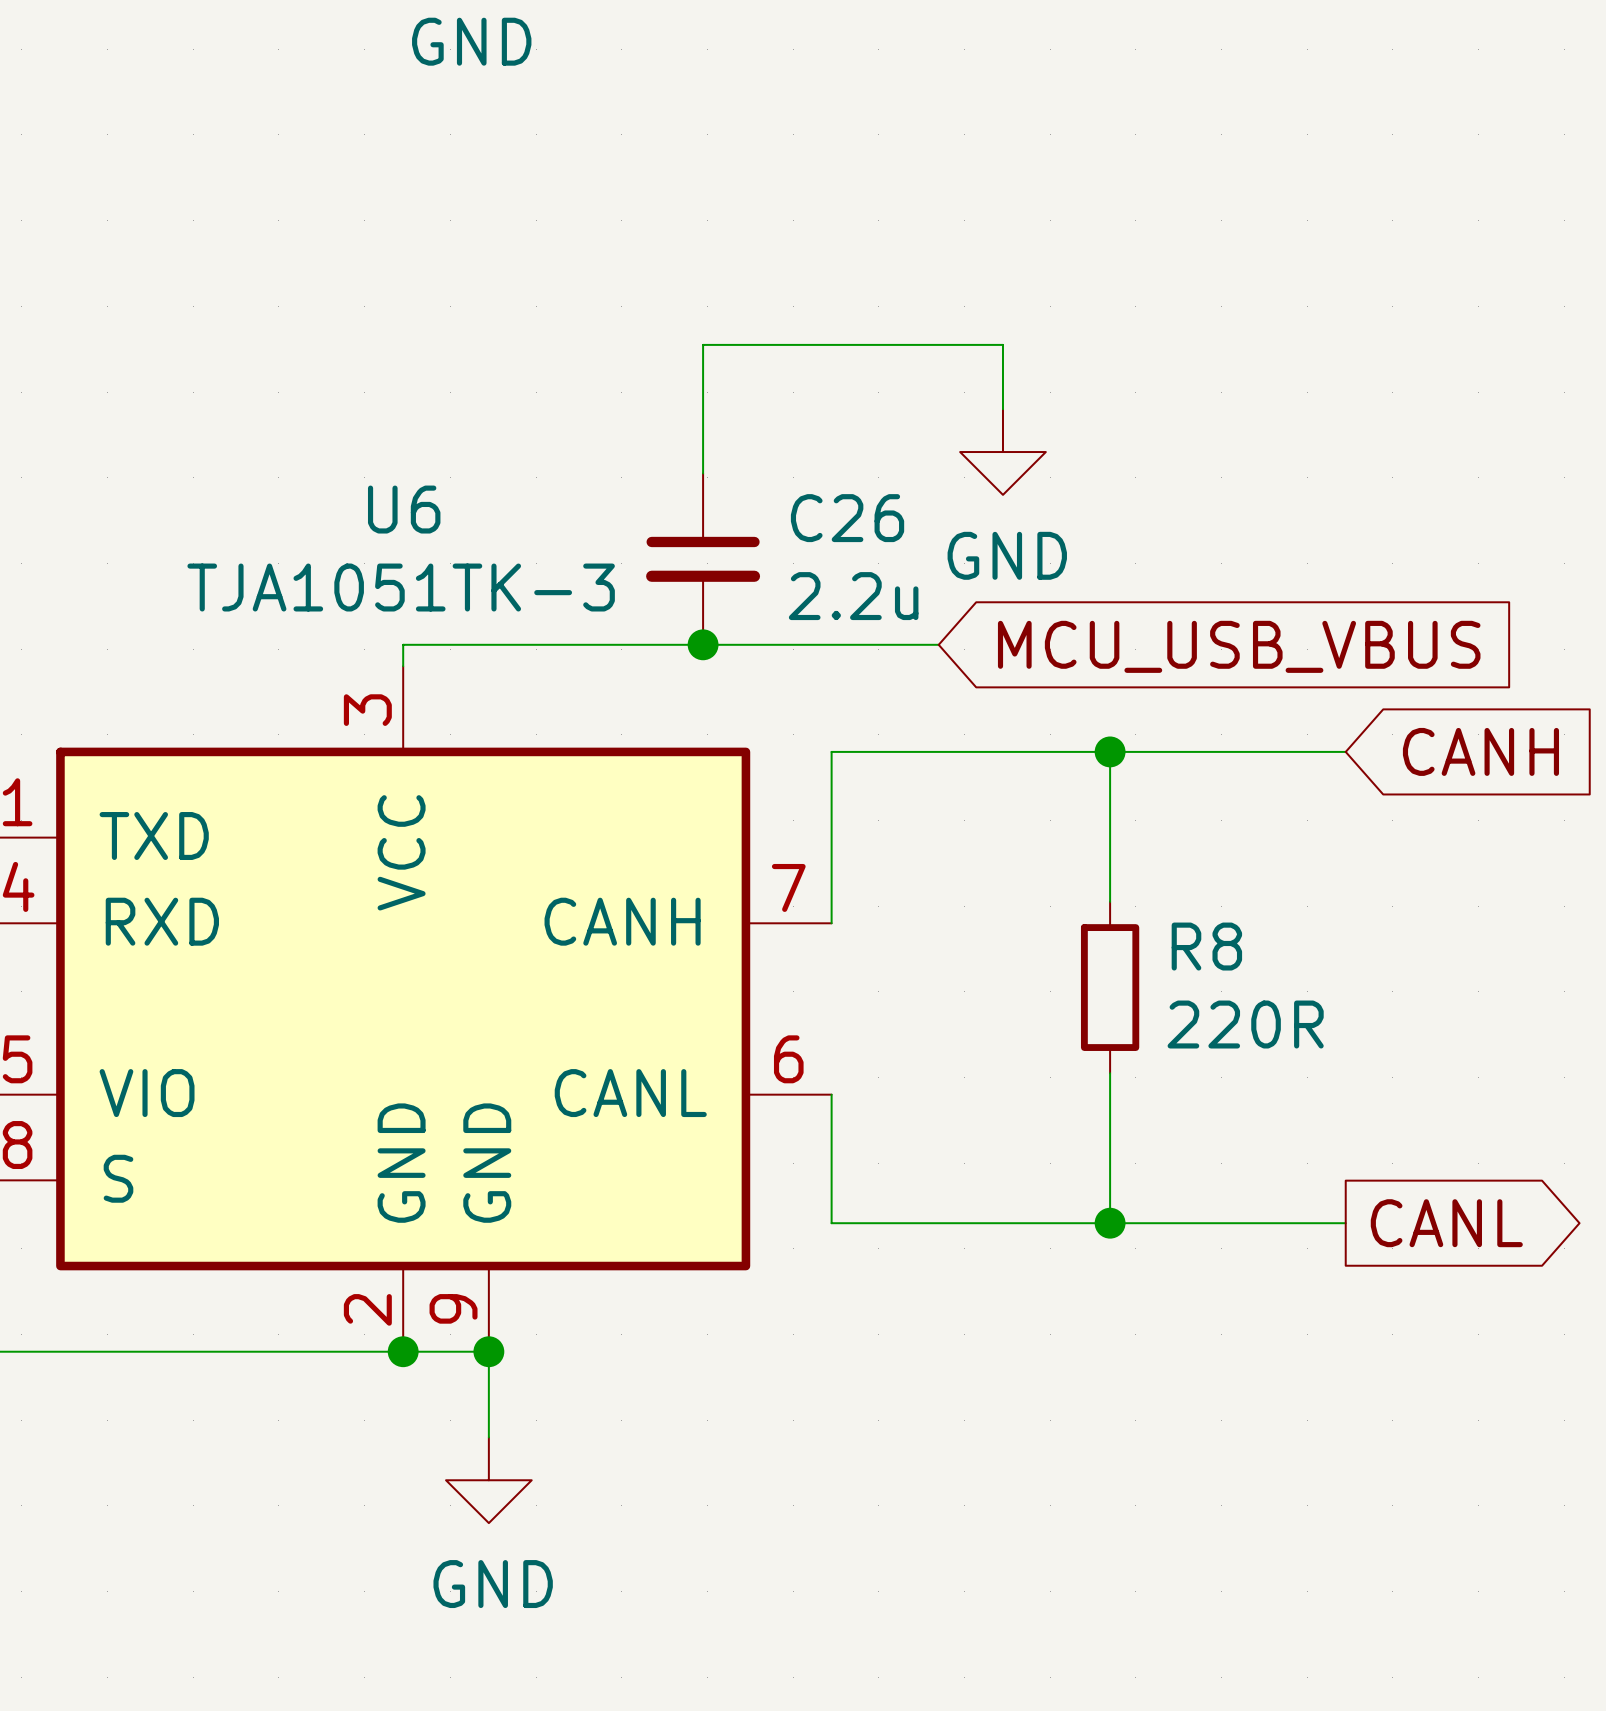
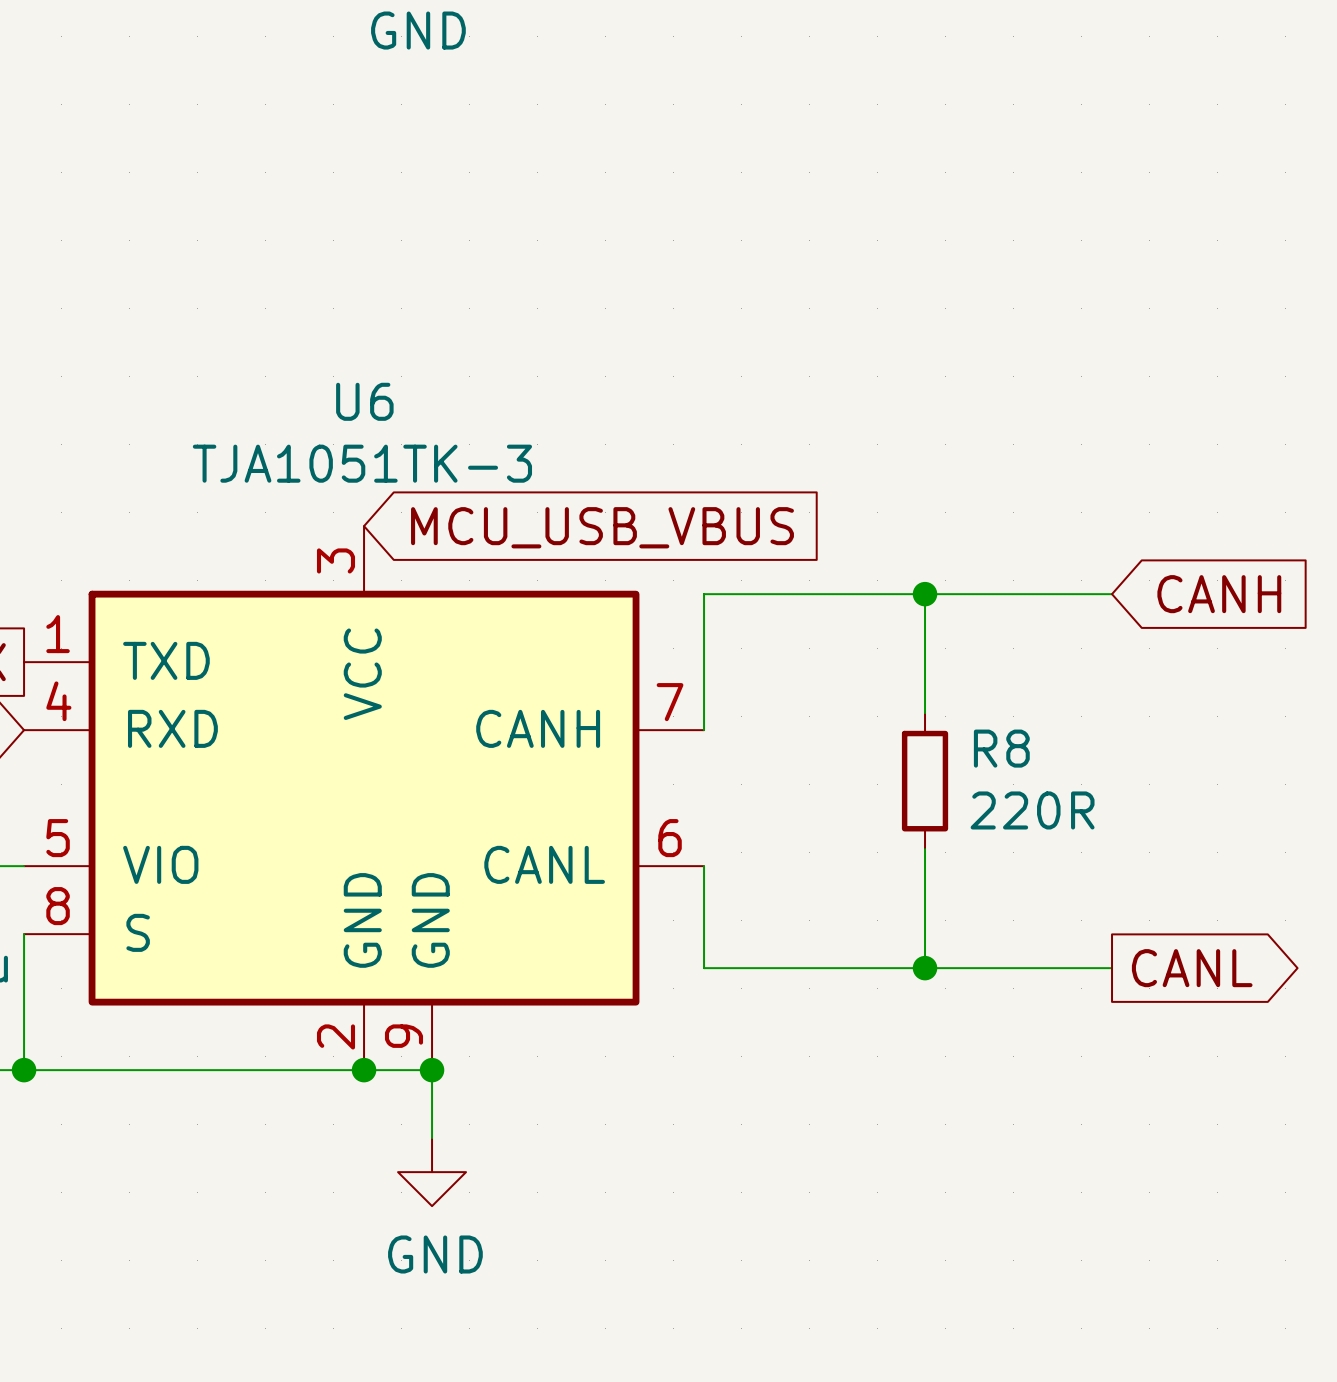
wire: (1002, 409) (1002, 344) (703, 344) (703, 473) -> none
power symbol: GND (1002, 452) -> none
C26: 2.2u (703, 559) -> none
junction: (703, 644) -> none
wire: (938, 644) (403, 644) (403, 666) -> none
global label position: MCU_USB_VBUS (1239, 646) -> MCU_USB_VBUS (602, 527)

